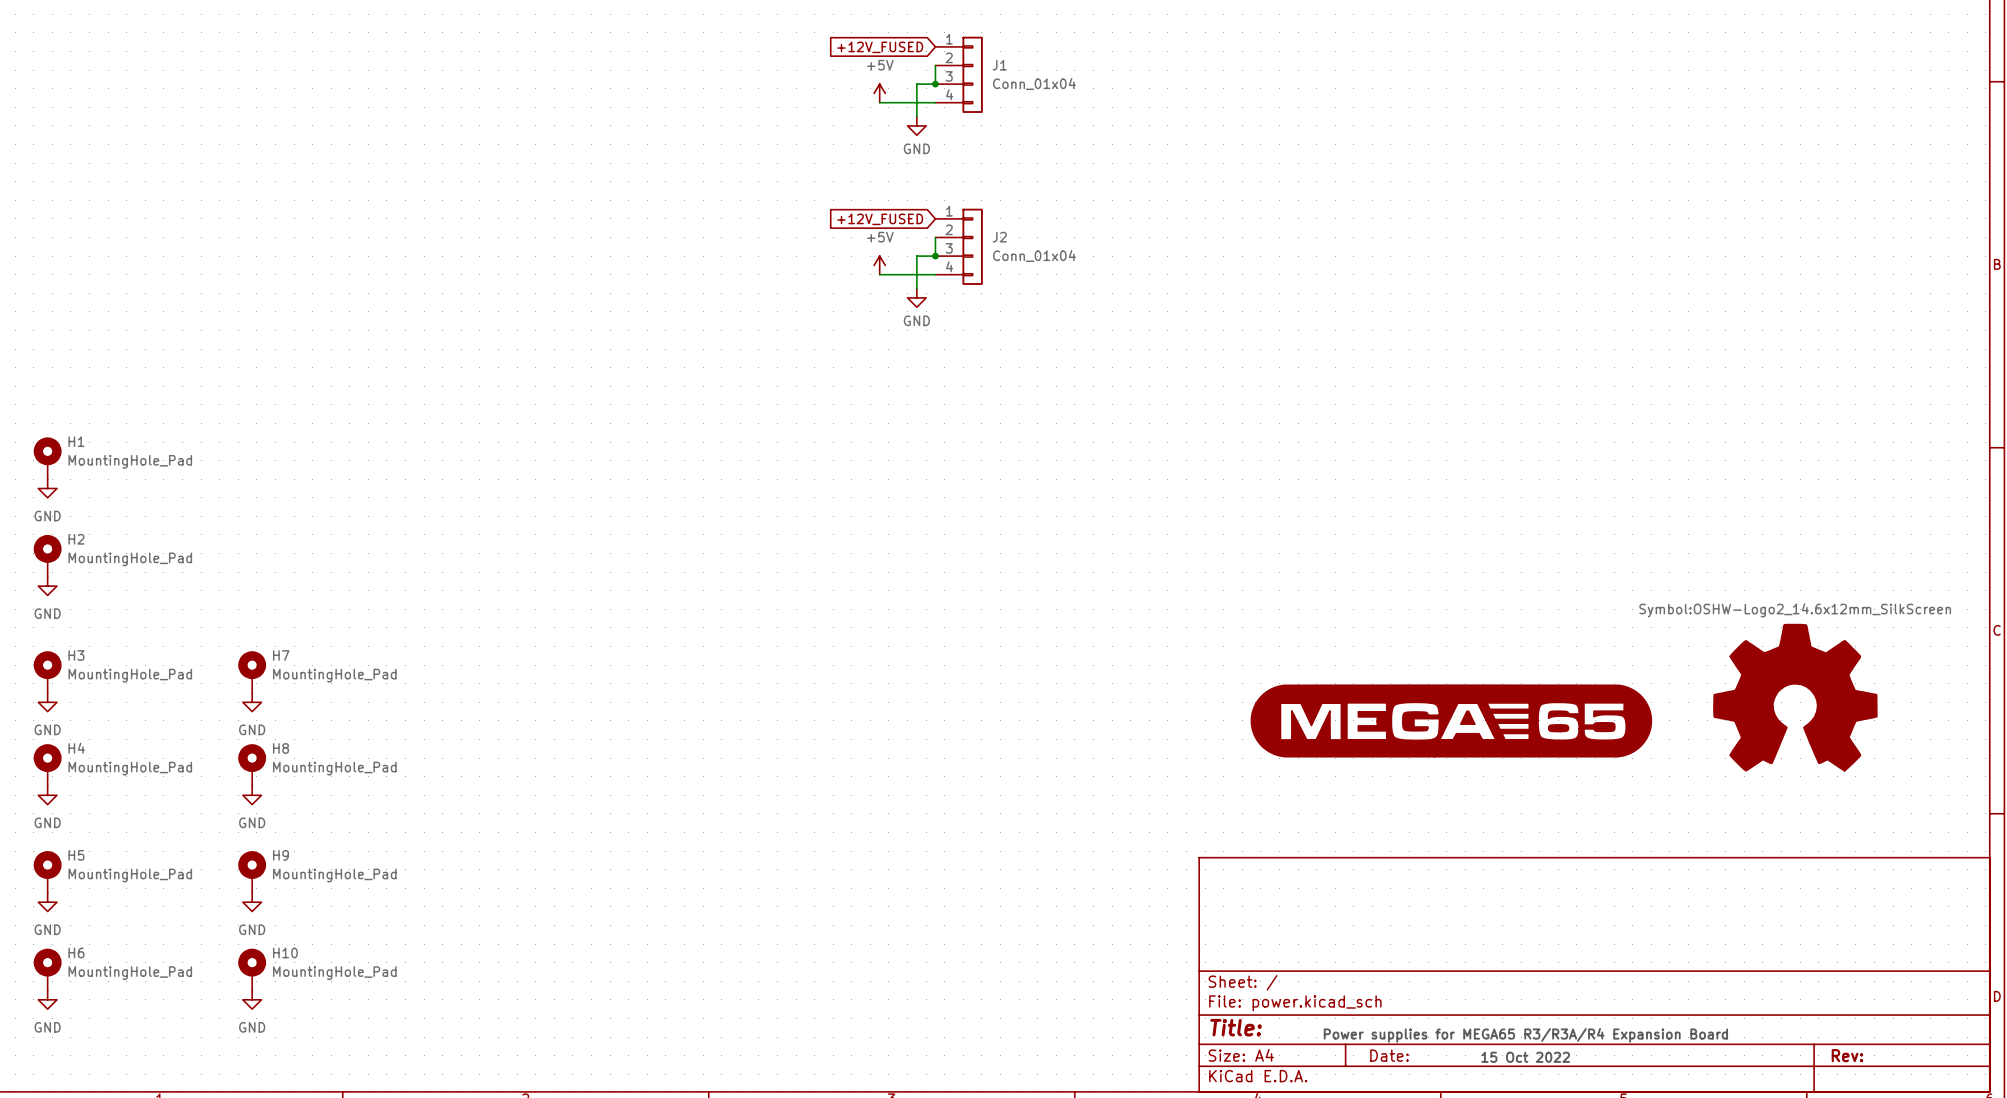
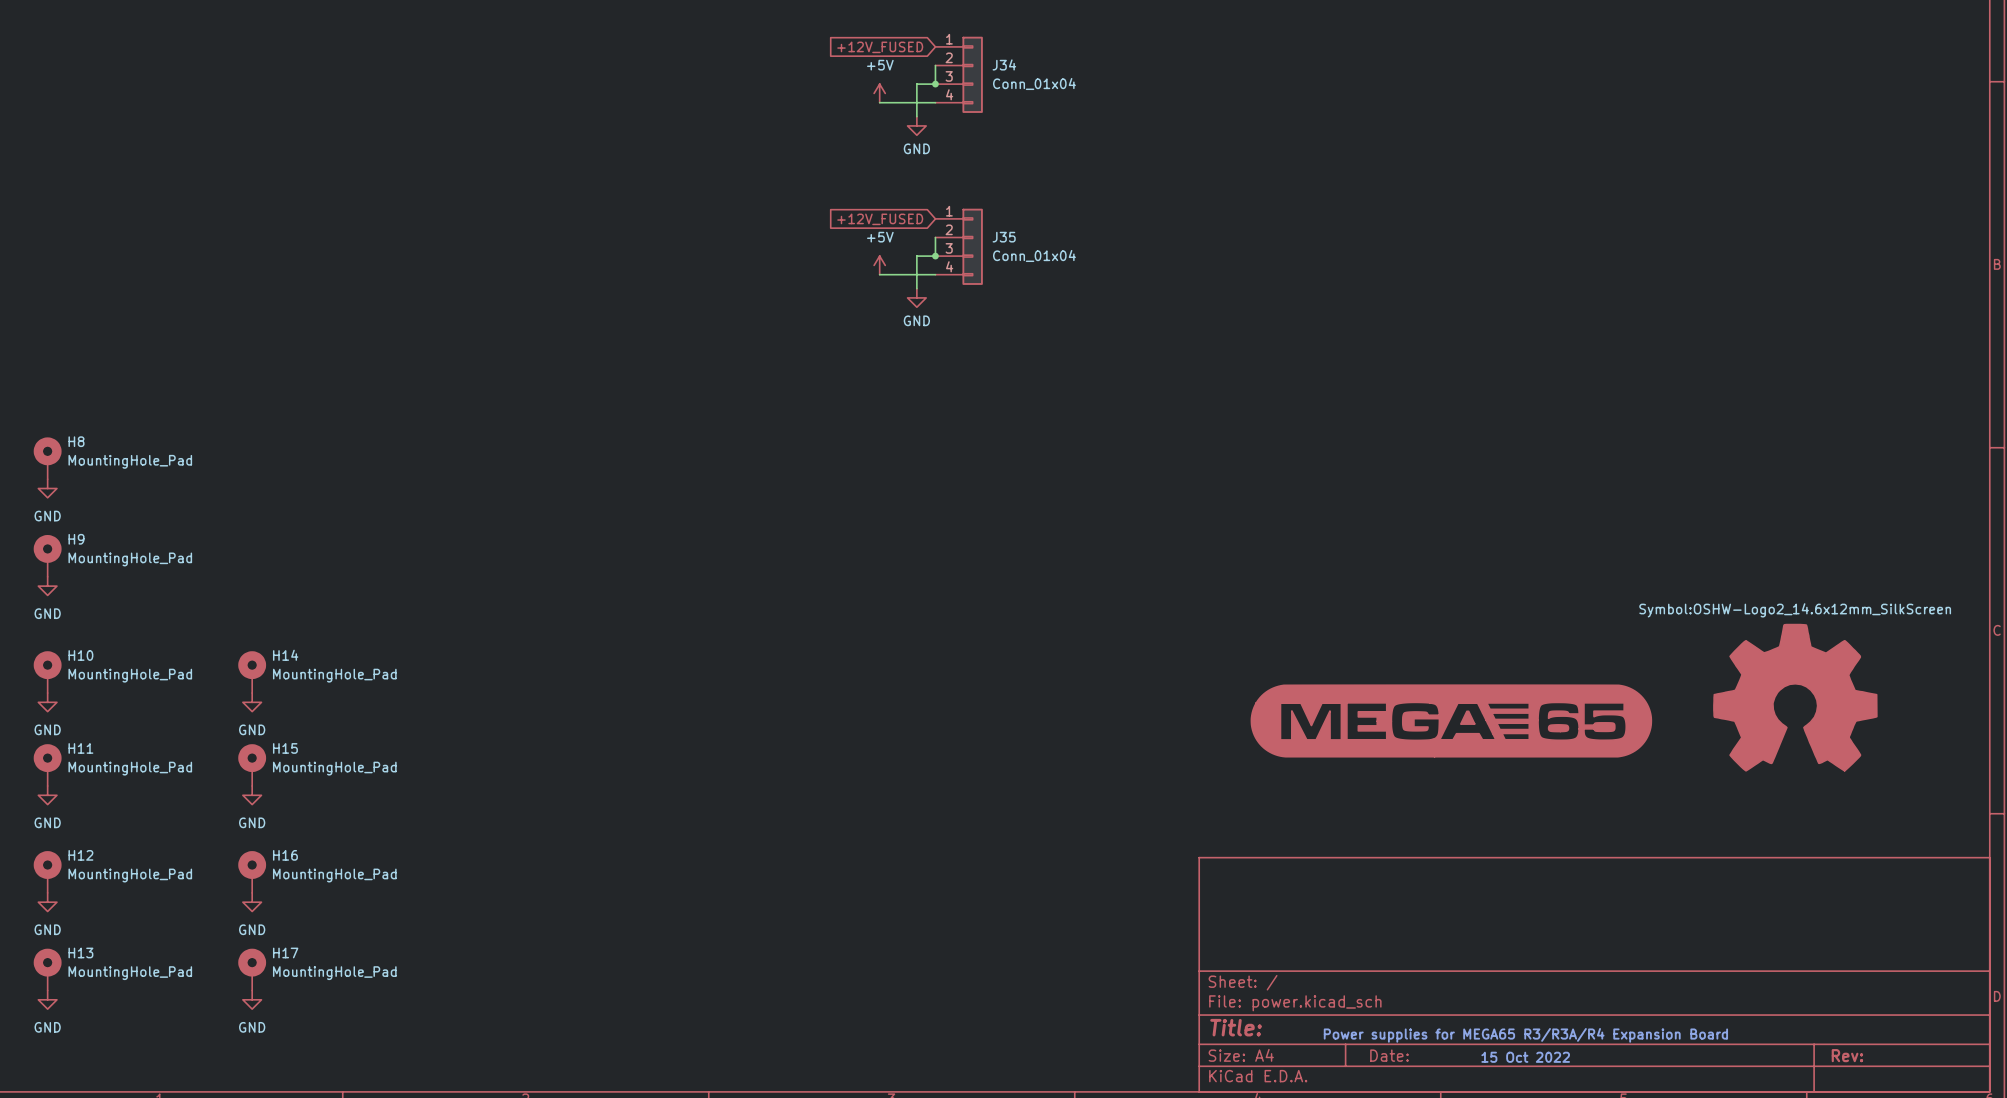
J1 name: J1 (999, 65) -> J34 (1004, 64)
J2 name: J2 (999, 237) -> J35 (1004, 237)
H1 name: H1 (76, 441) -> H8 (76, 441)
H2 name: H2 (76, 539) -> H9 (76, 539)
H3 name: H3 (76, 655) -> H10 (80, 655)
H7 name: H7 (281, 655) -> H14 (285, 655)
H4 name: H4 (76, 748) -> H11 (80, 748)
H8 name: H8 (281, 748) -> H15 (285, 748)
H5 name: H5 (76, 855) -> H12 (80, 855)
H9 name: H9 (281, 855) -> H16 (285, 855)
H6 name: H6 (76, 952) -> H13 (80, 952)
H10 name: H10 (285, 952) -> H17 (285, 952)

